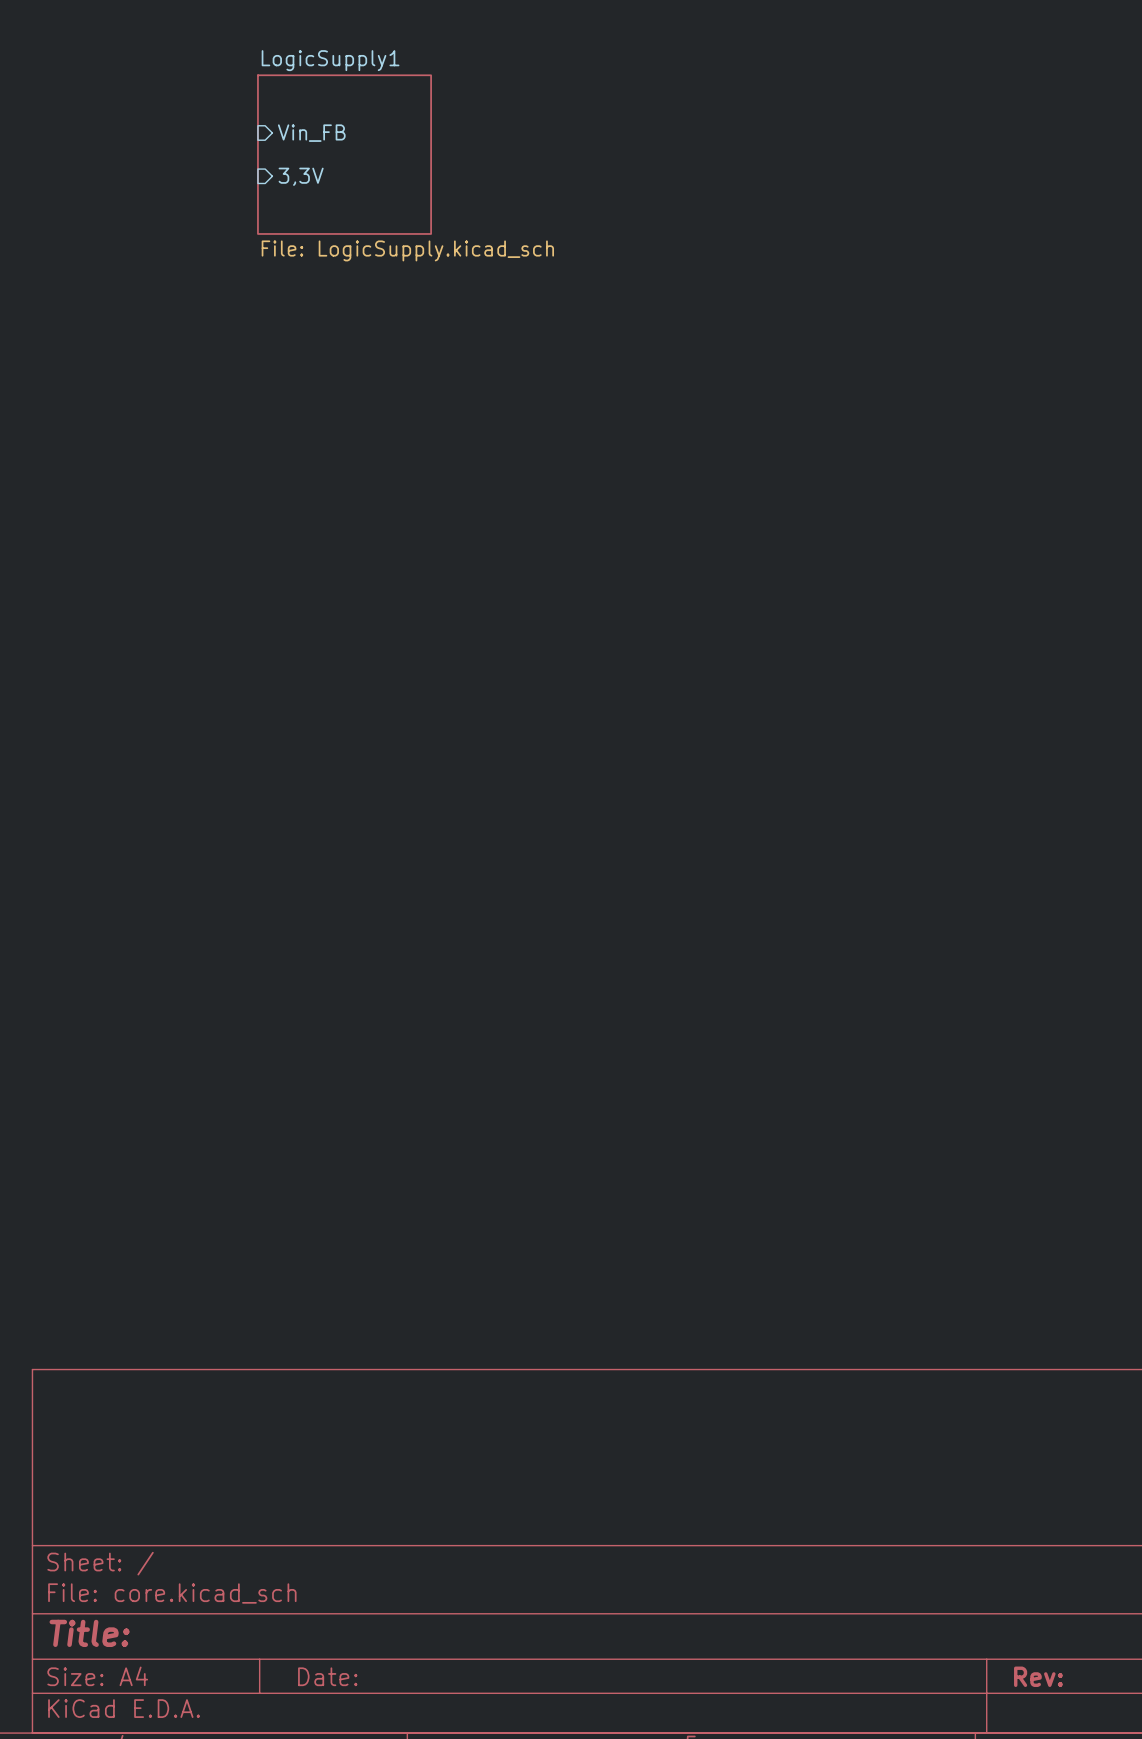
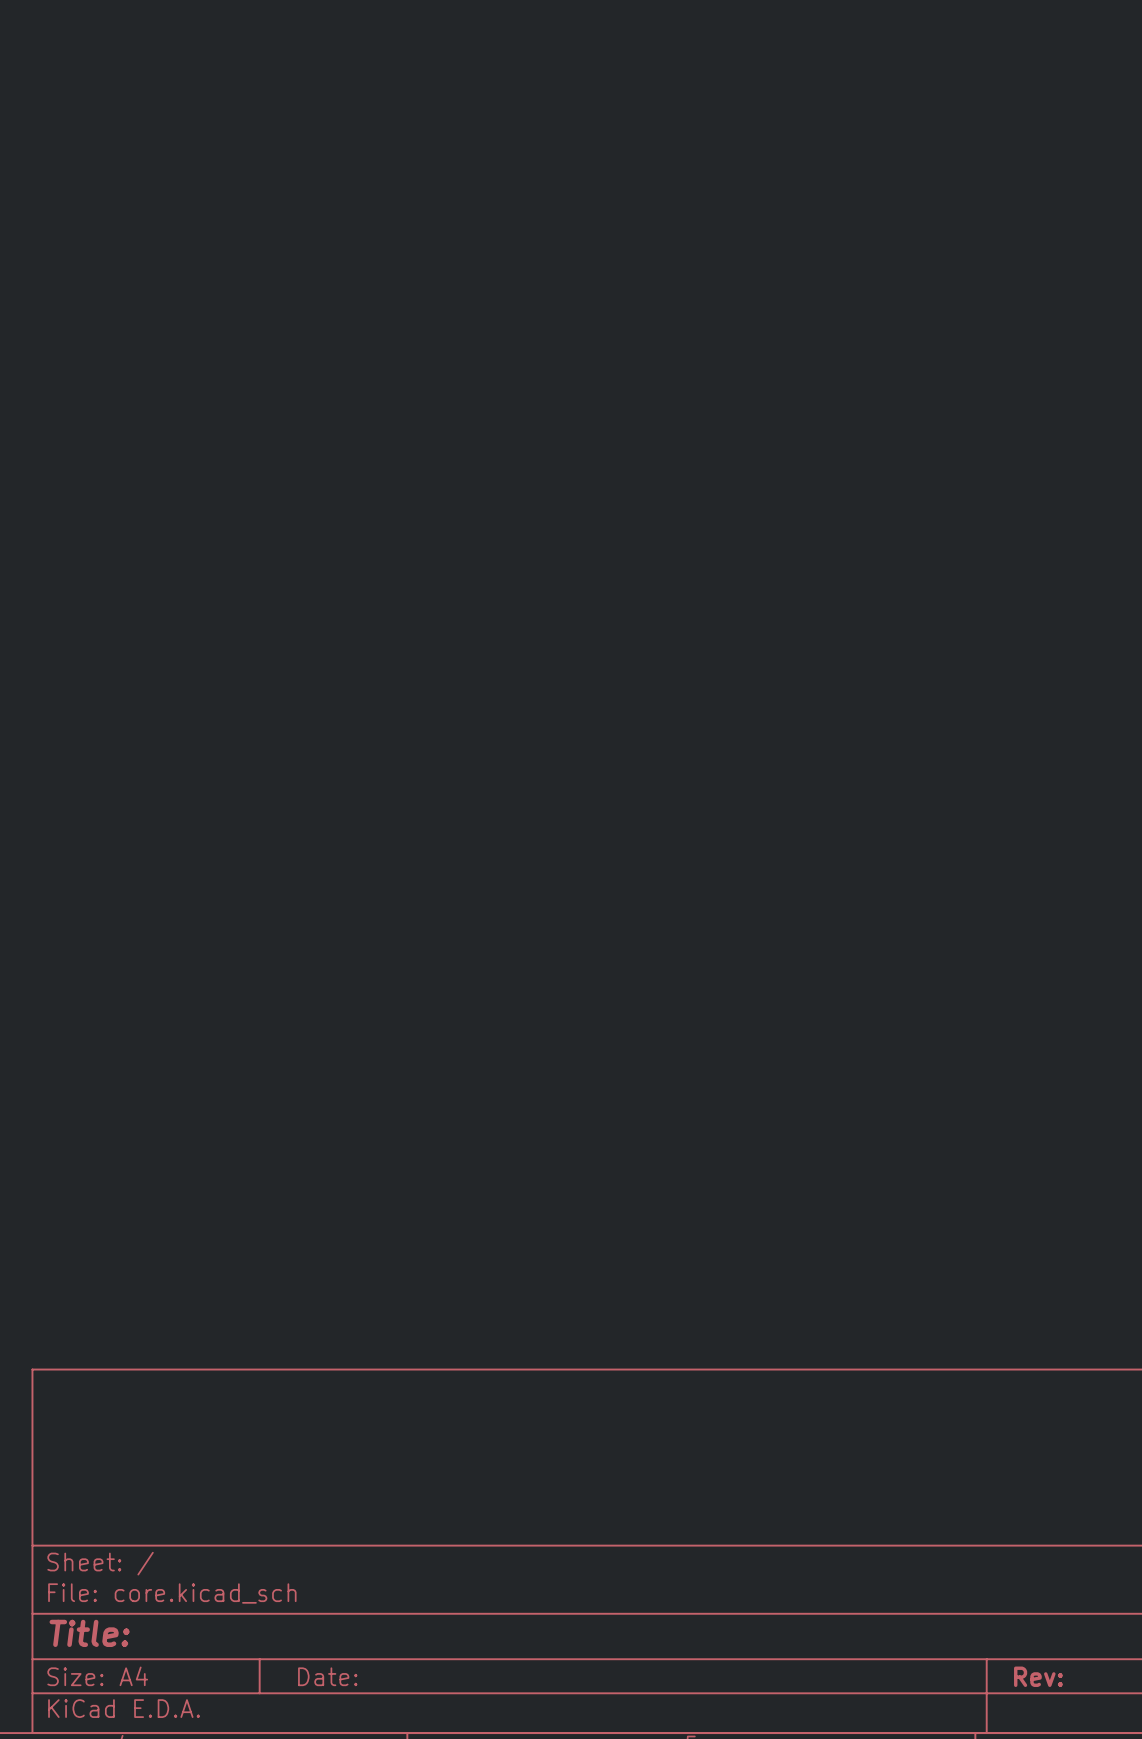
sheet pin: Vin_FB (311, 133) -> none
sheet LogicSupply1: File: LogicSupply.kicad_sch (344, 154) -> none
sheet pin: 3,3V (301, 176) -> none

